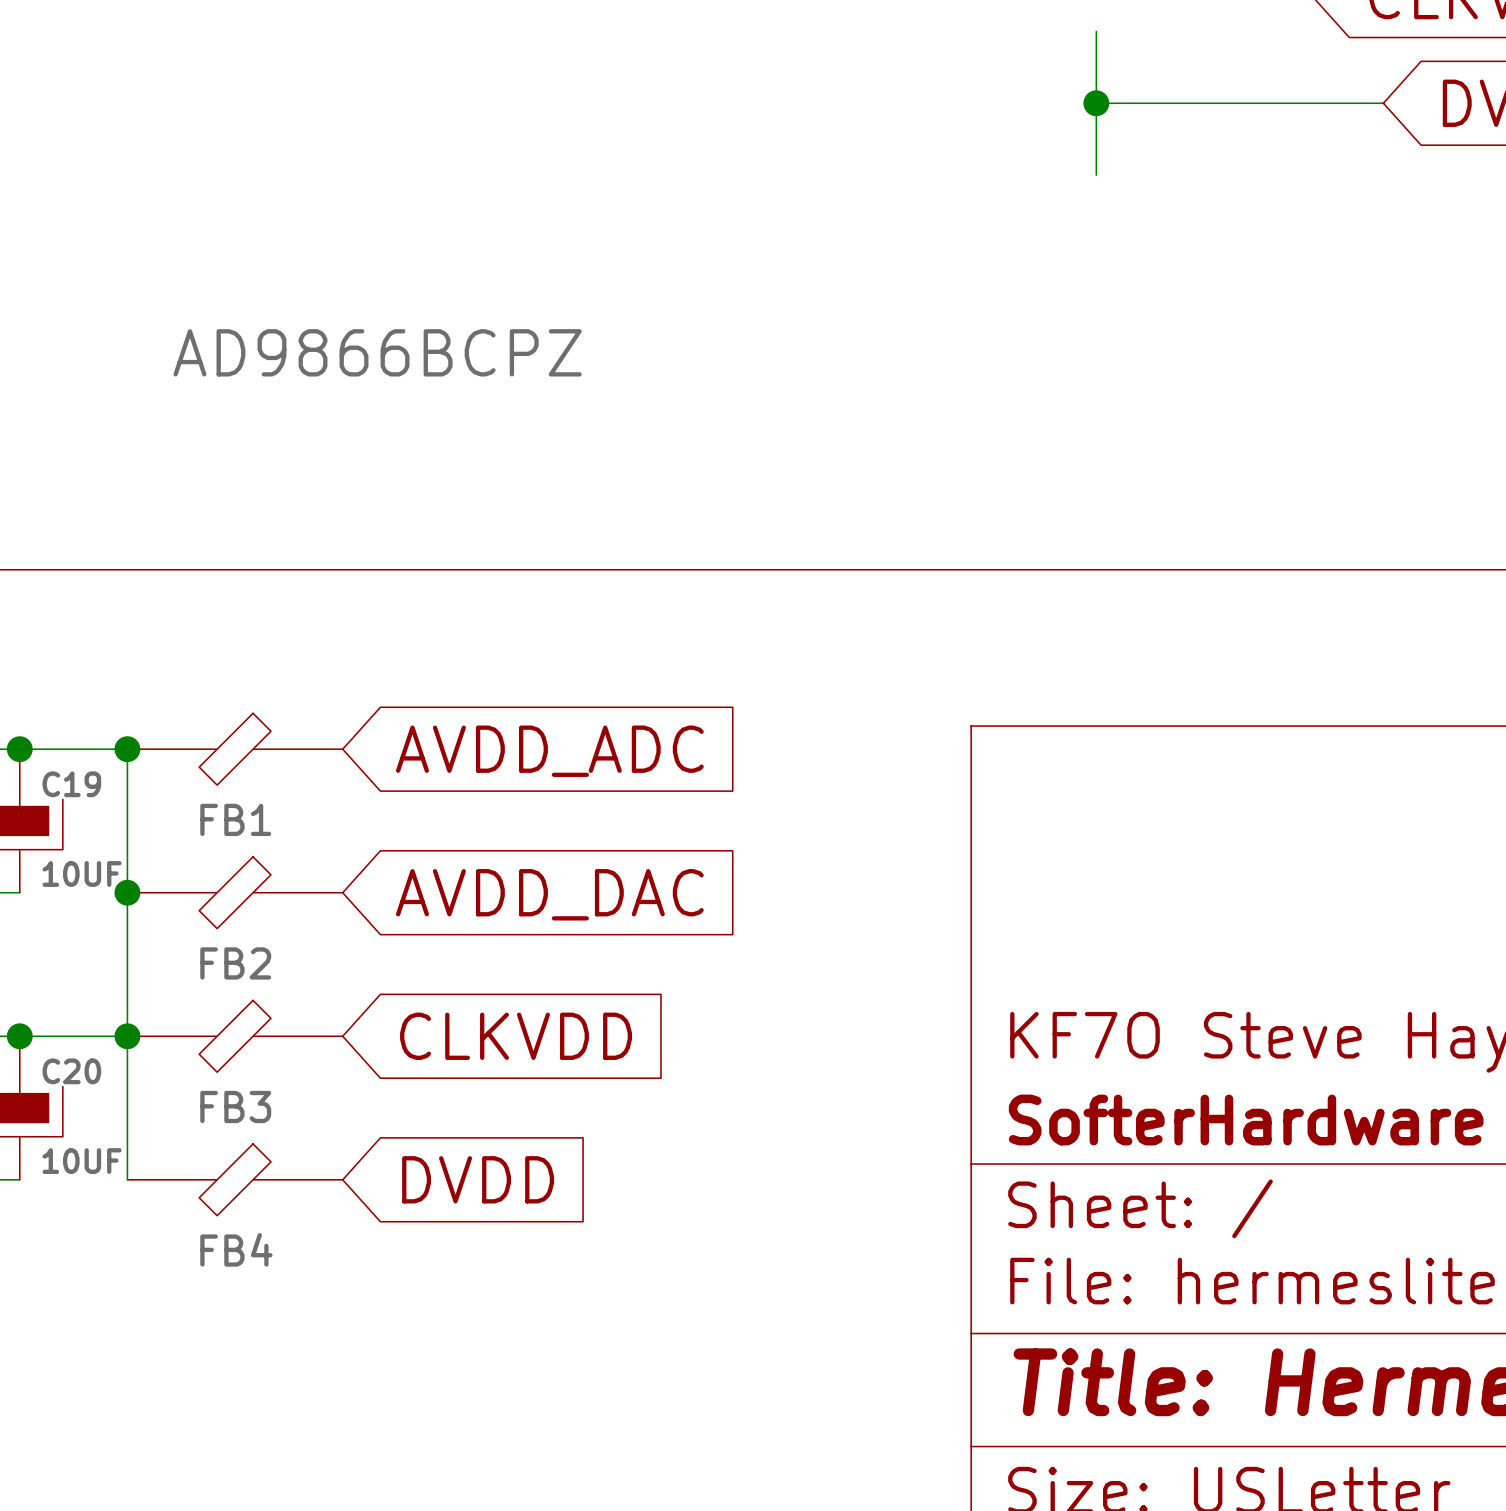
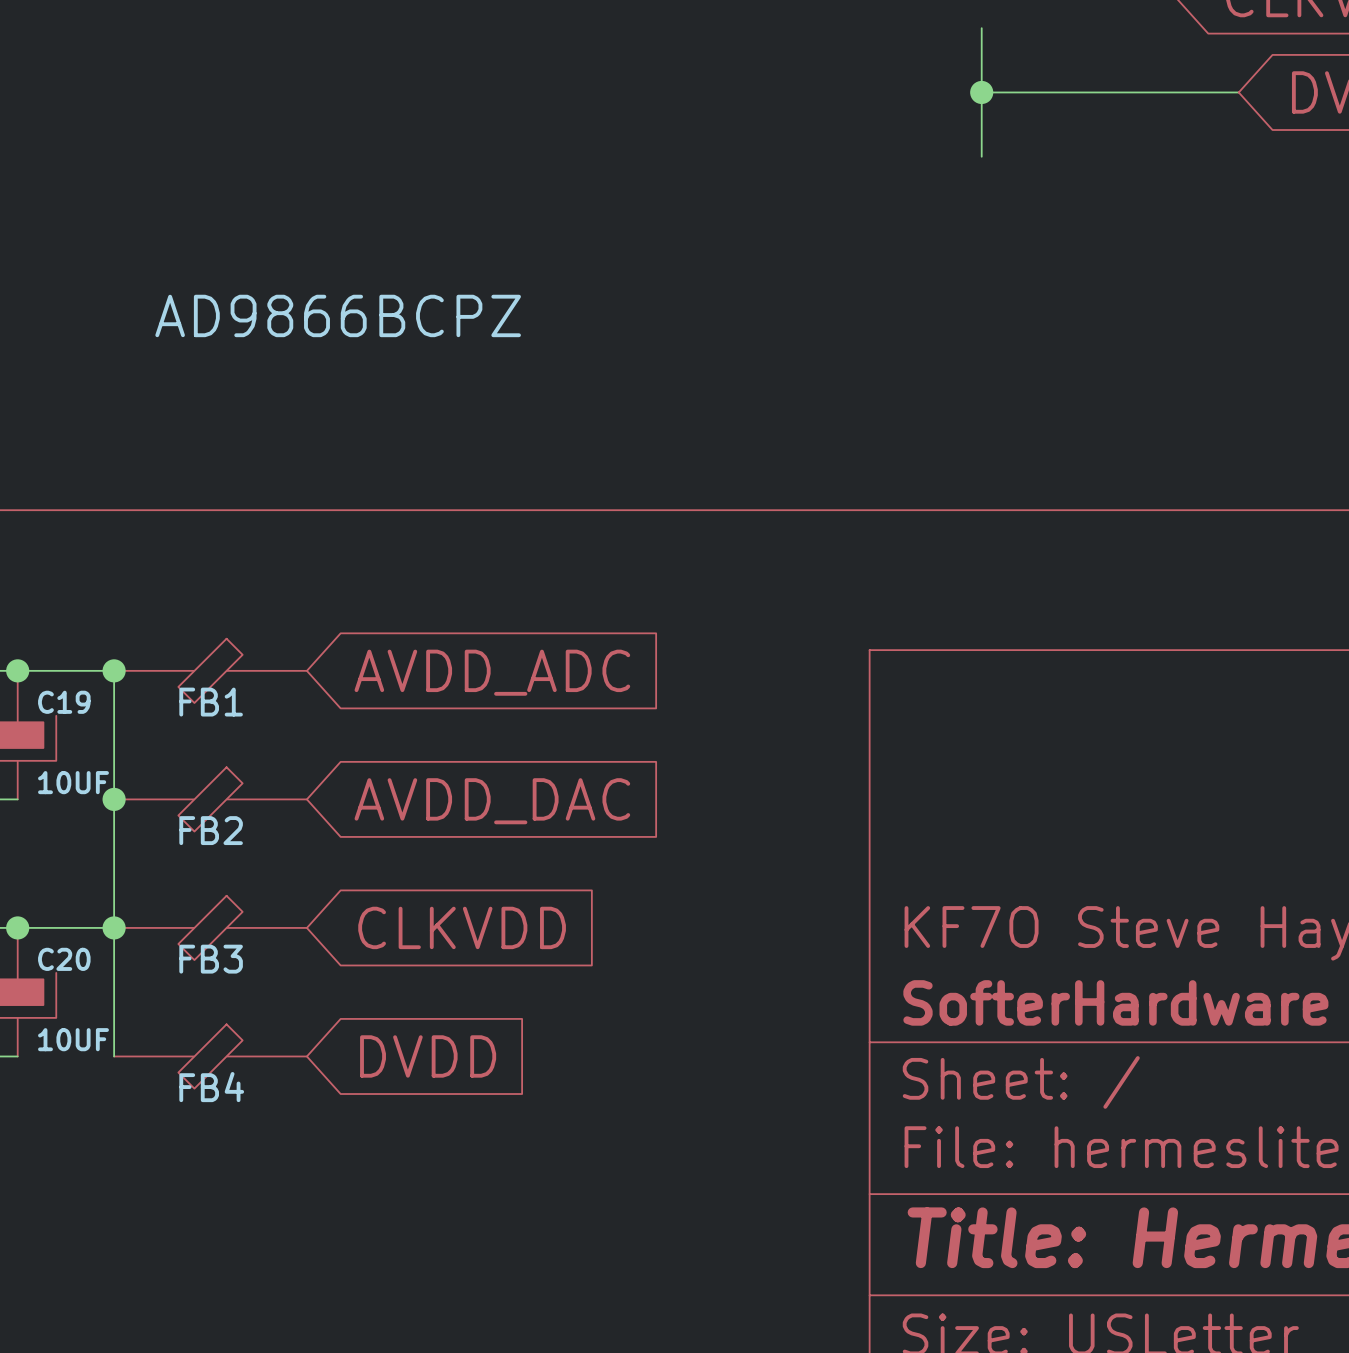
FB1 name position: FB1 (235, 819) -> FB1 (211, 702)
FB2 name position: FB2 (235, 963) -> FB2 (211, 830)
FB3 name position: FB3 (235, 1107) -> FB3 (211, 959)
FB4 name position: FB4 (236, 1249) -> FB4 (211, 1087)

